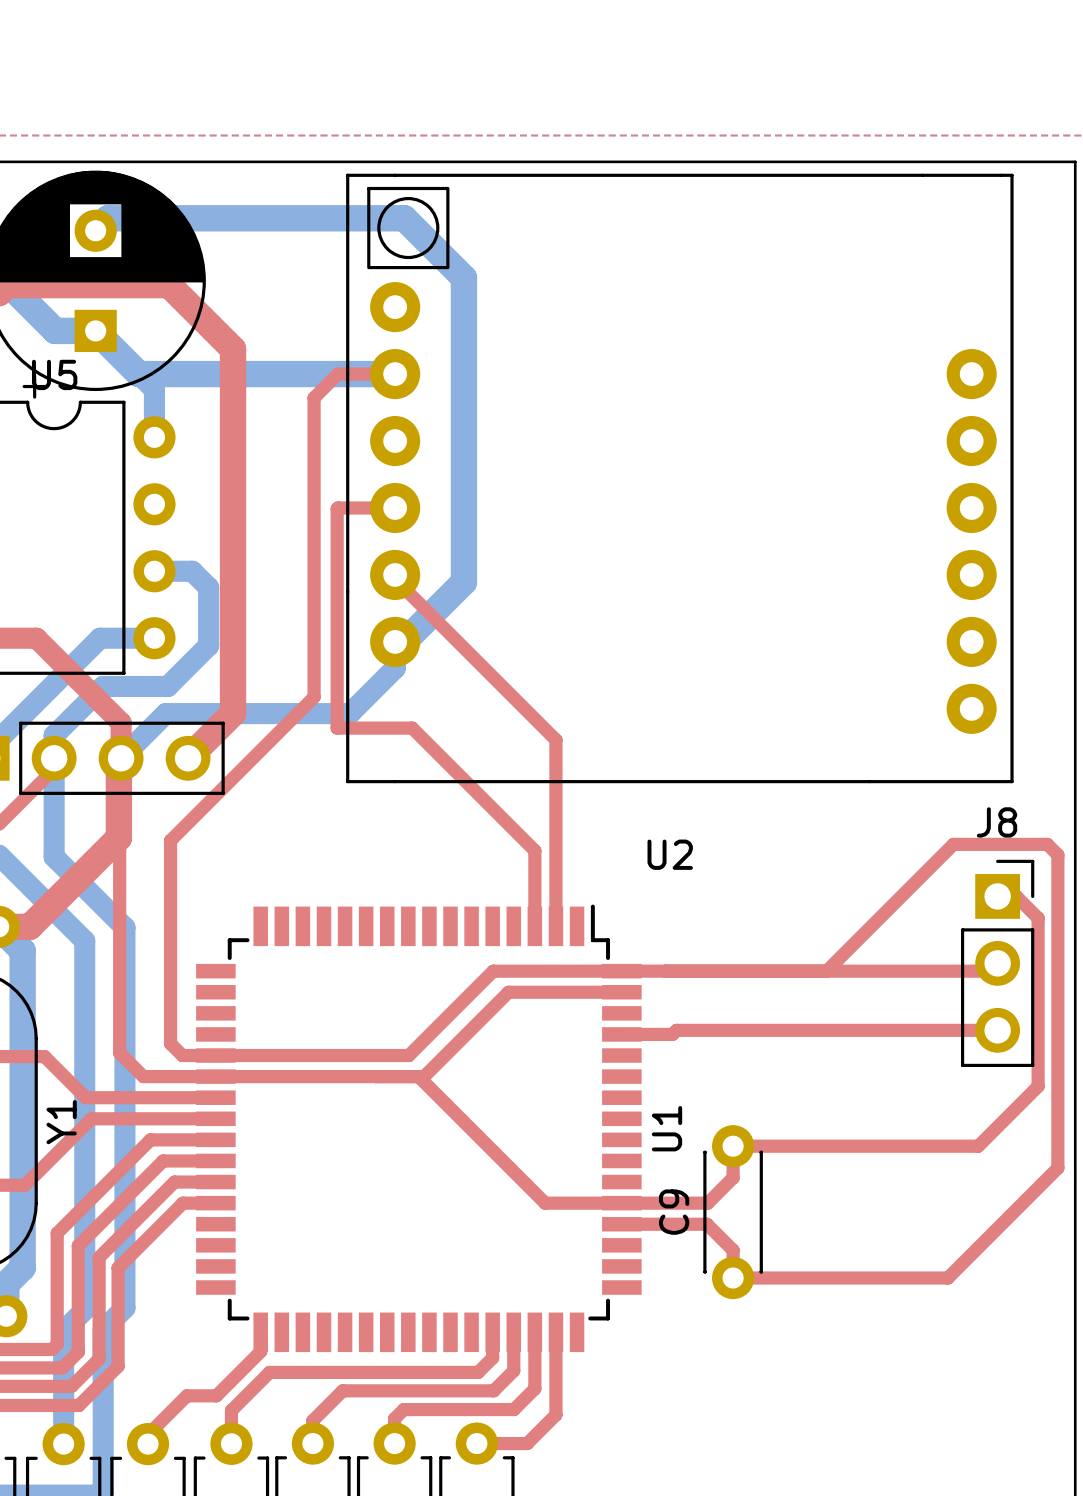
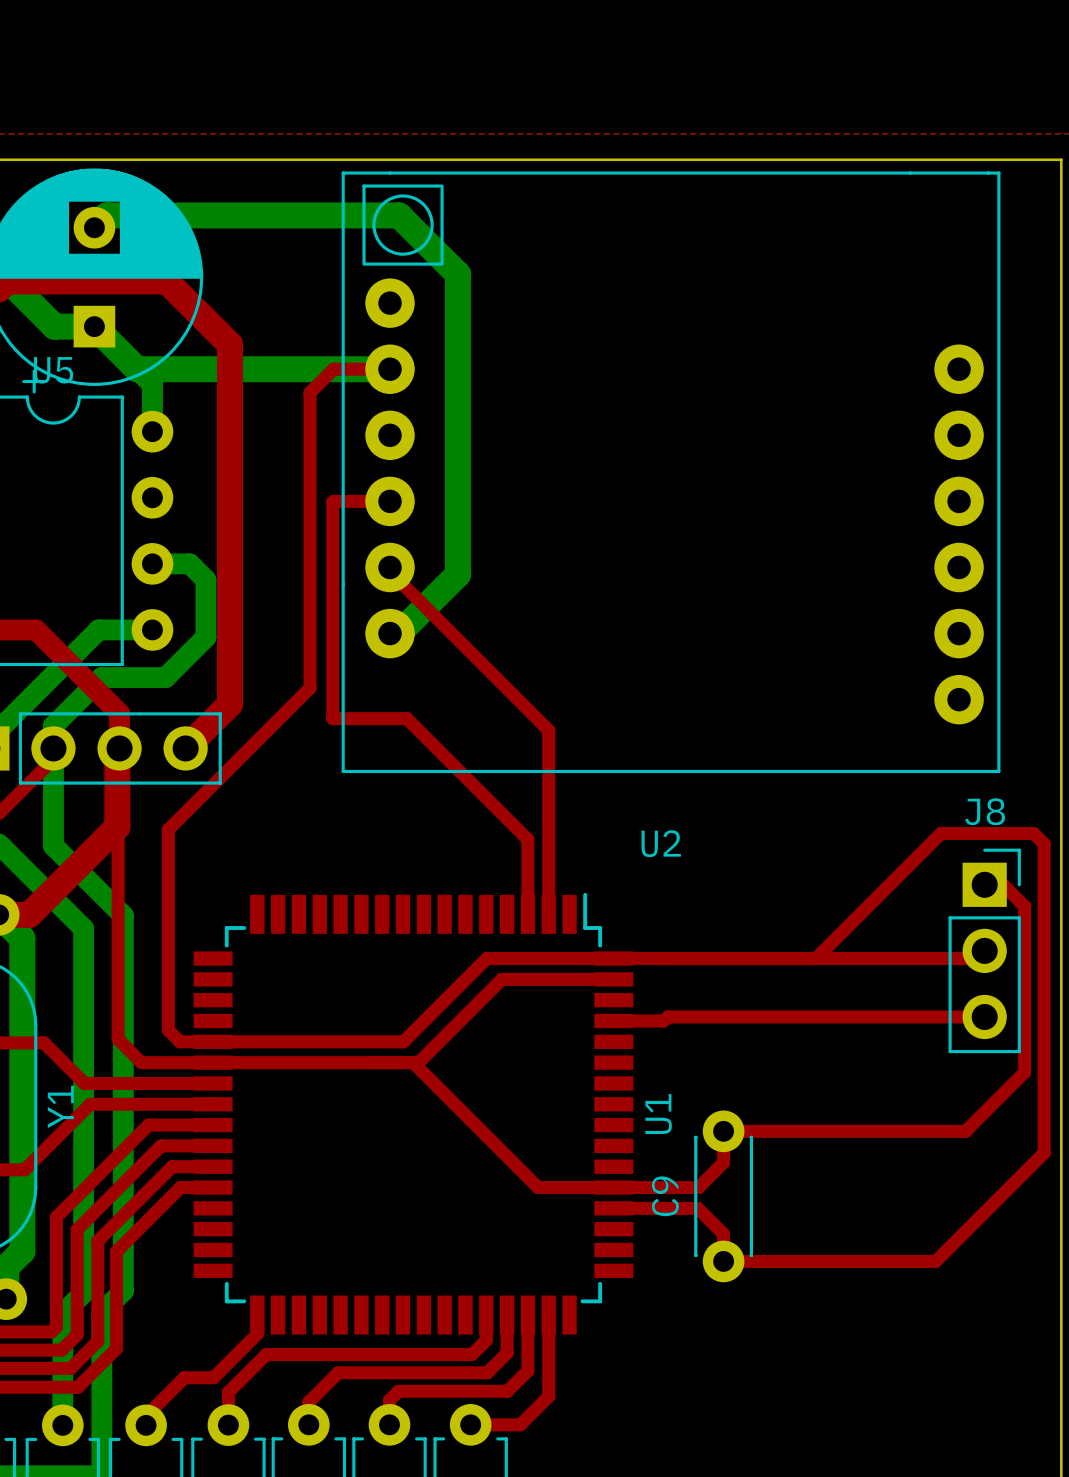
bottom track: (395, 641) (395, 668) (349, 713) (165, 713) (121, 758) -> none

